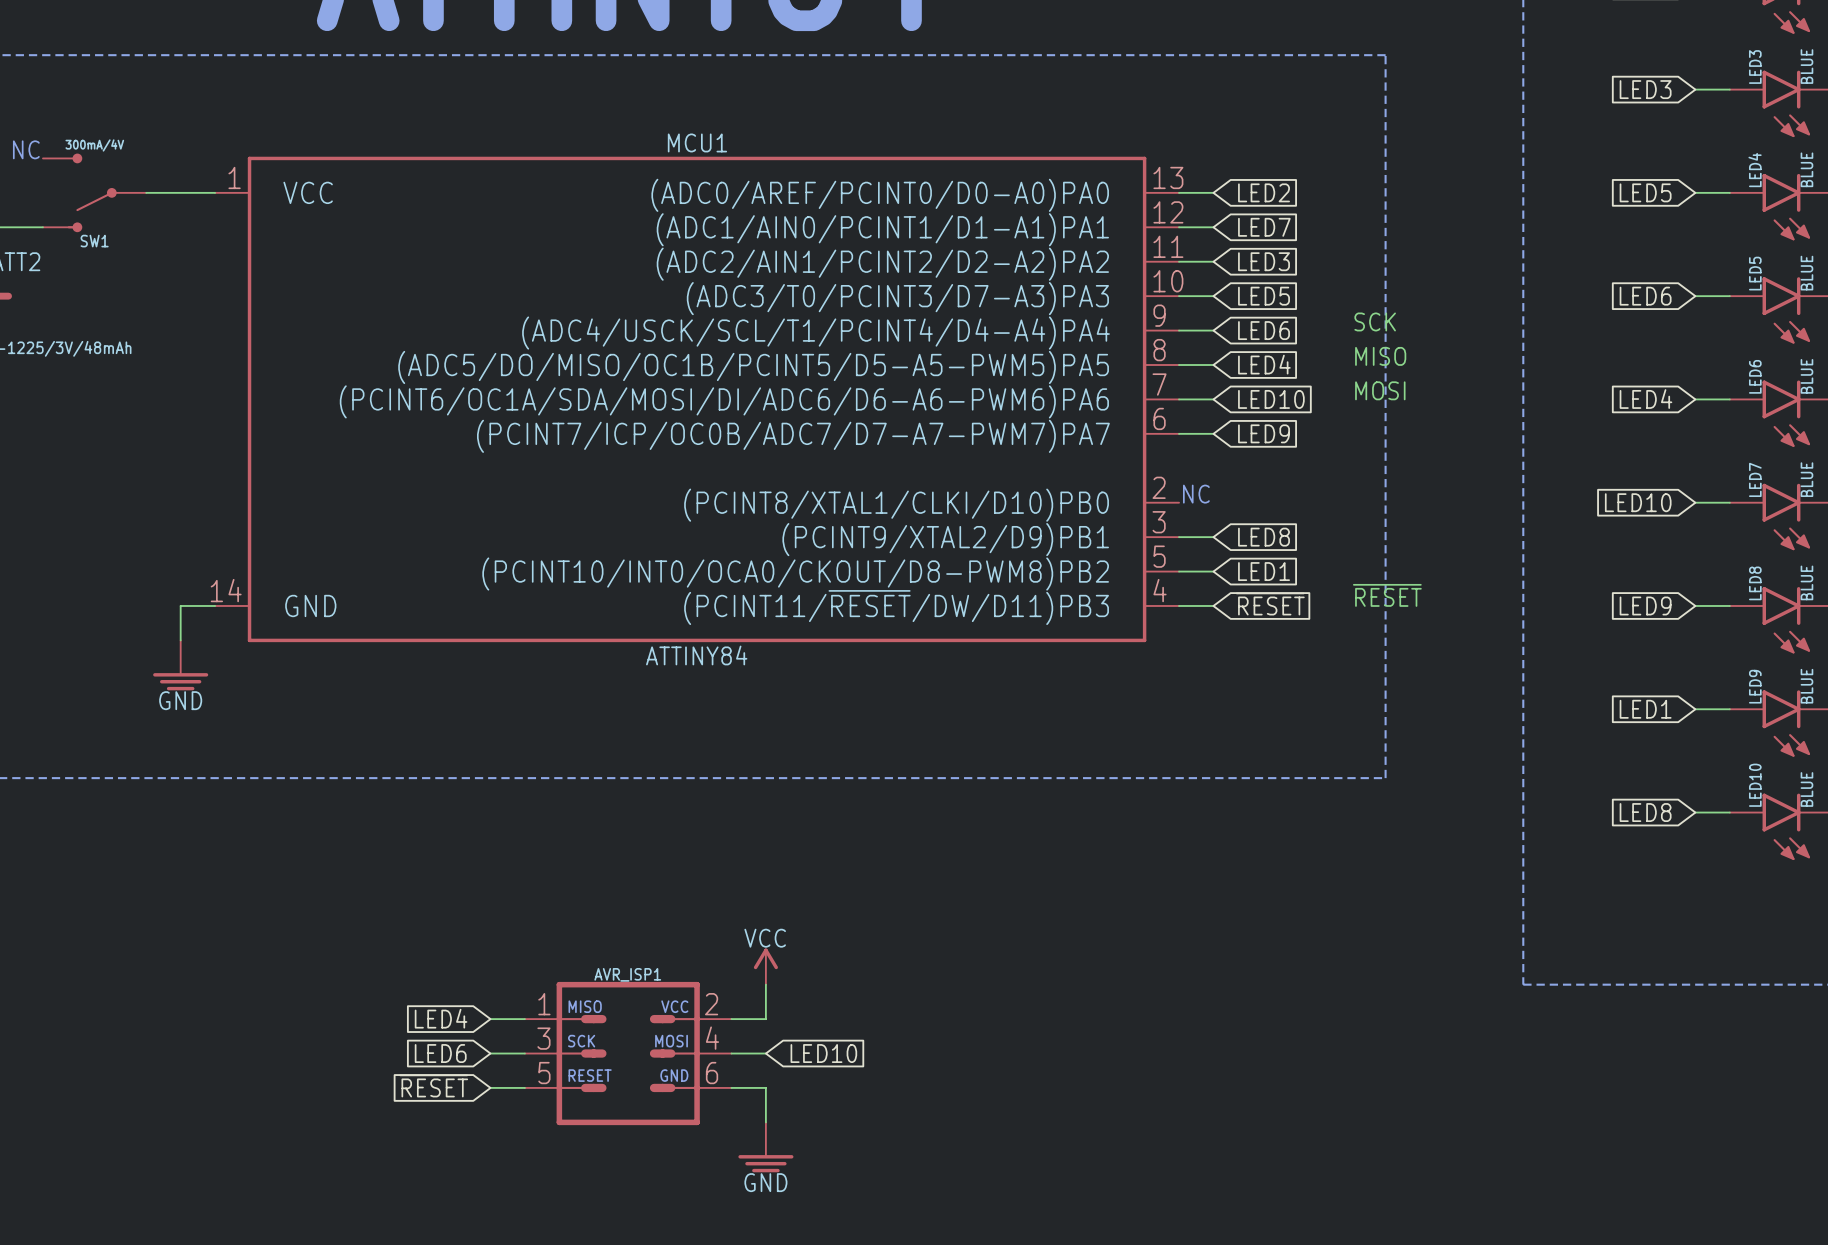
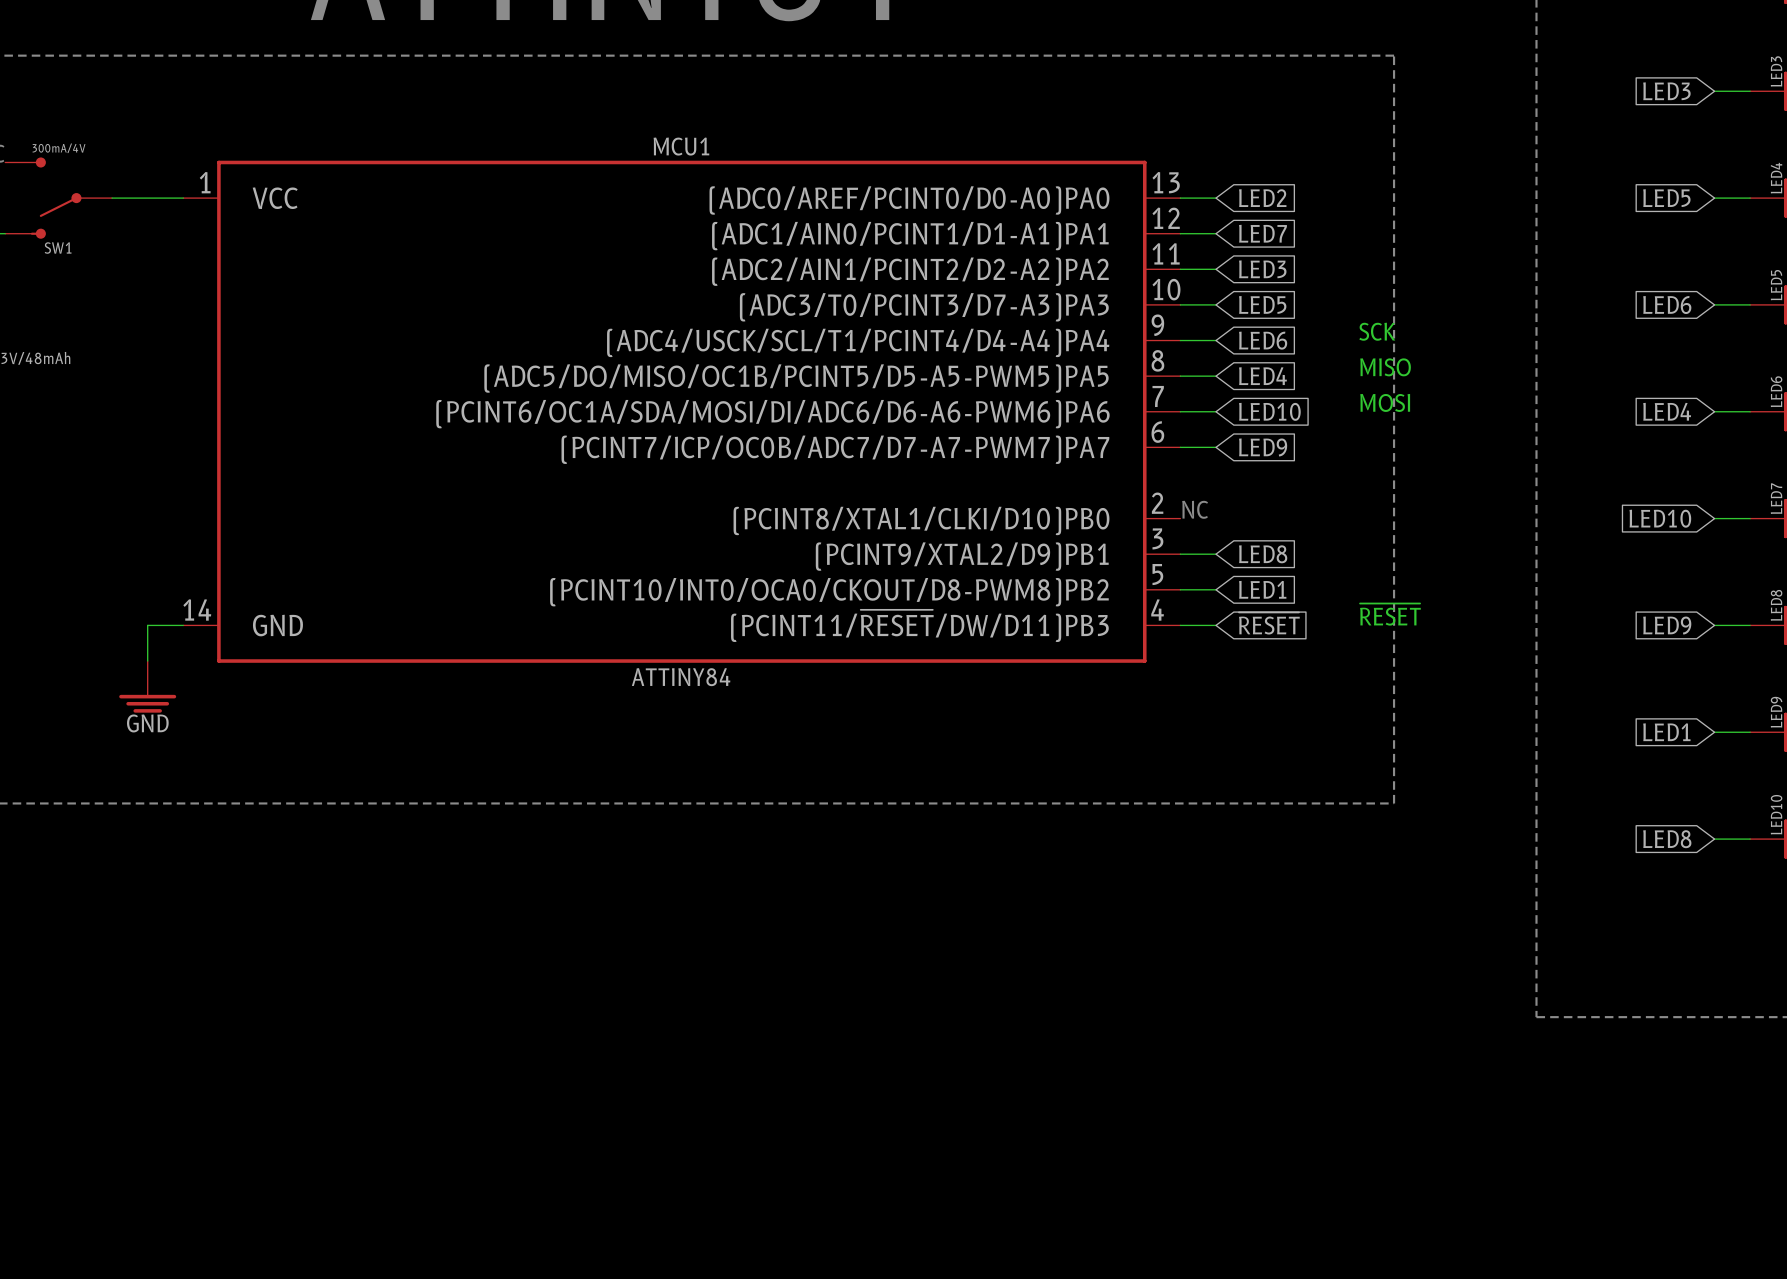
power symbol: (765, 966) -> none
wire: (765, 984) (765, 1019) (731, 1019) -> none
global label: LED4 (441, 1018) -> none
wire: (490, 1019) (524, 1019) -> none
global label: LED6 (440, 1053) -> none
wire: (490, 1053) (524, 1053) -> none
AVR_ISP1: (628, 1053) -> none
wire: (731, 1053) (765, 1053) -> none
global label: LED10 (823, 1053) -> none
global label: ~{RESET} (433, 1085) -> none
wire: (490, 1087) (524, 1087) -> none
wire: (731, 1087) (765, 1087) (765, 1122) -> none
power symbol: (765, 1147) -> none

